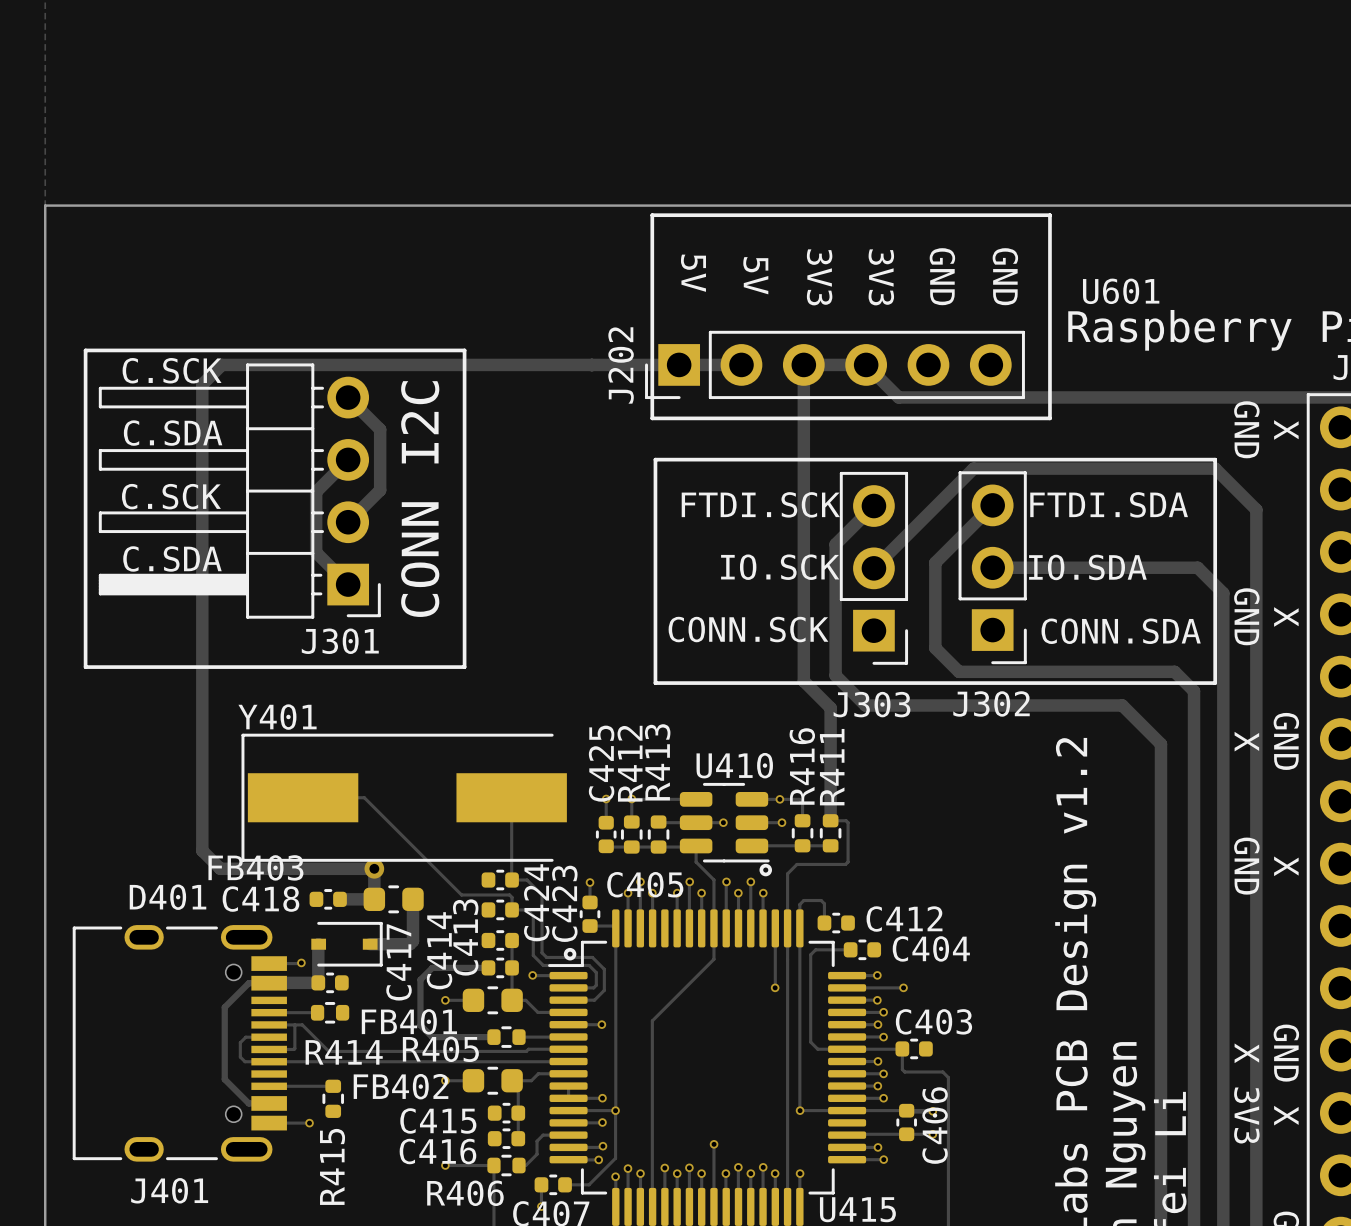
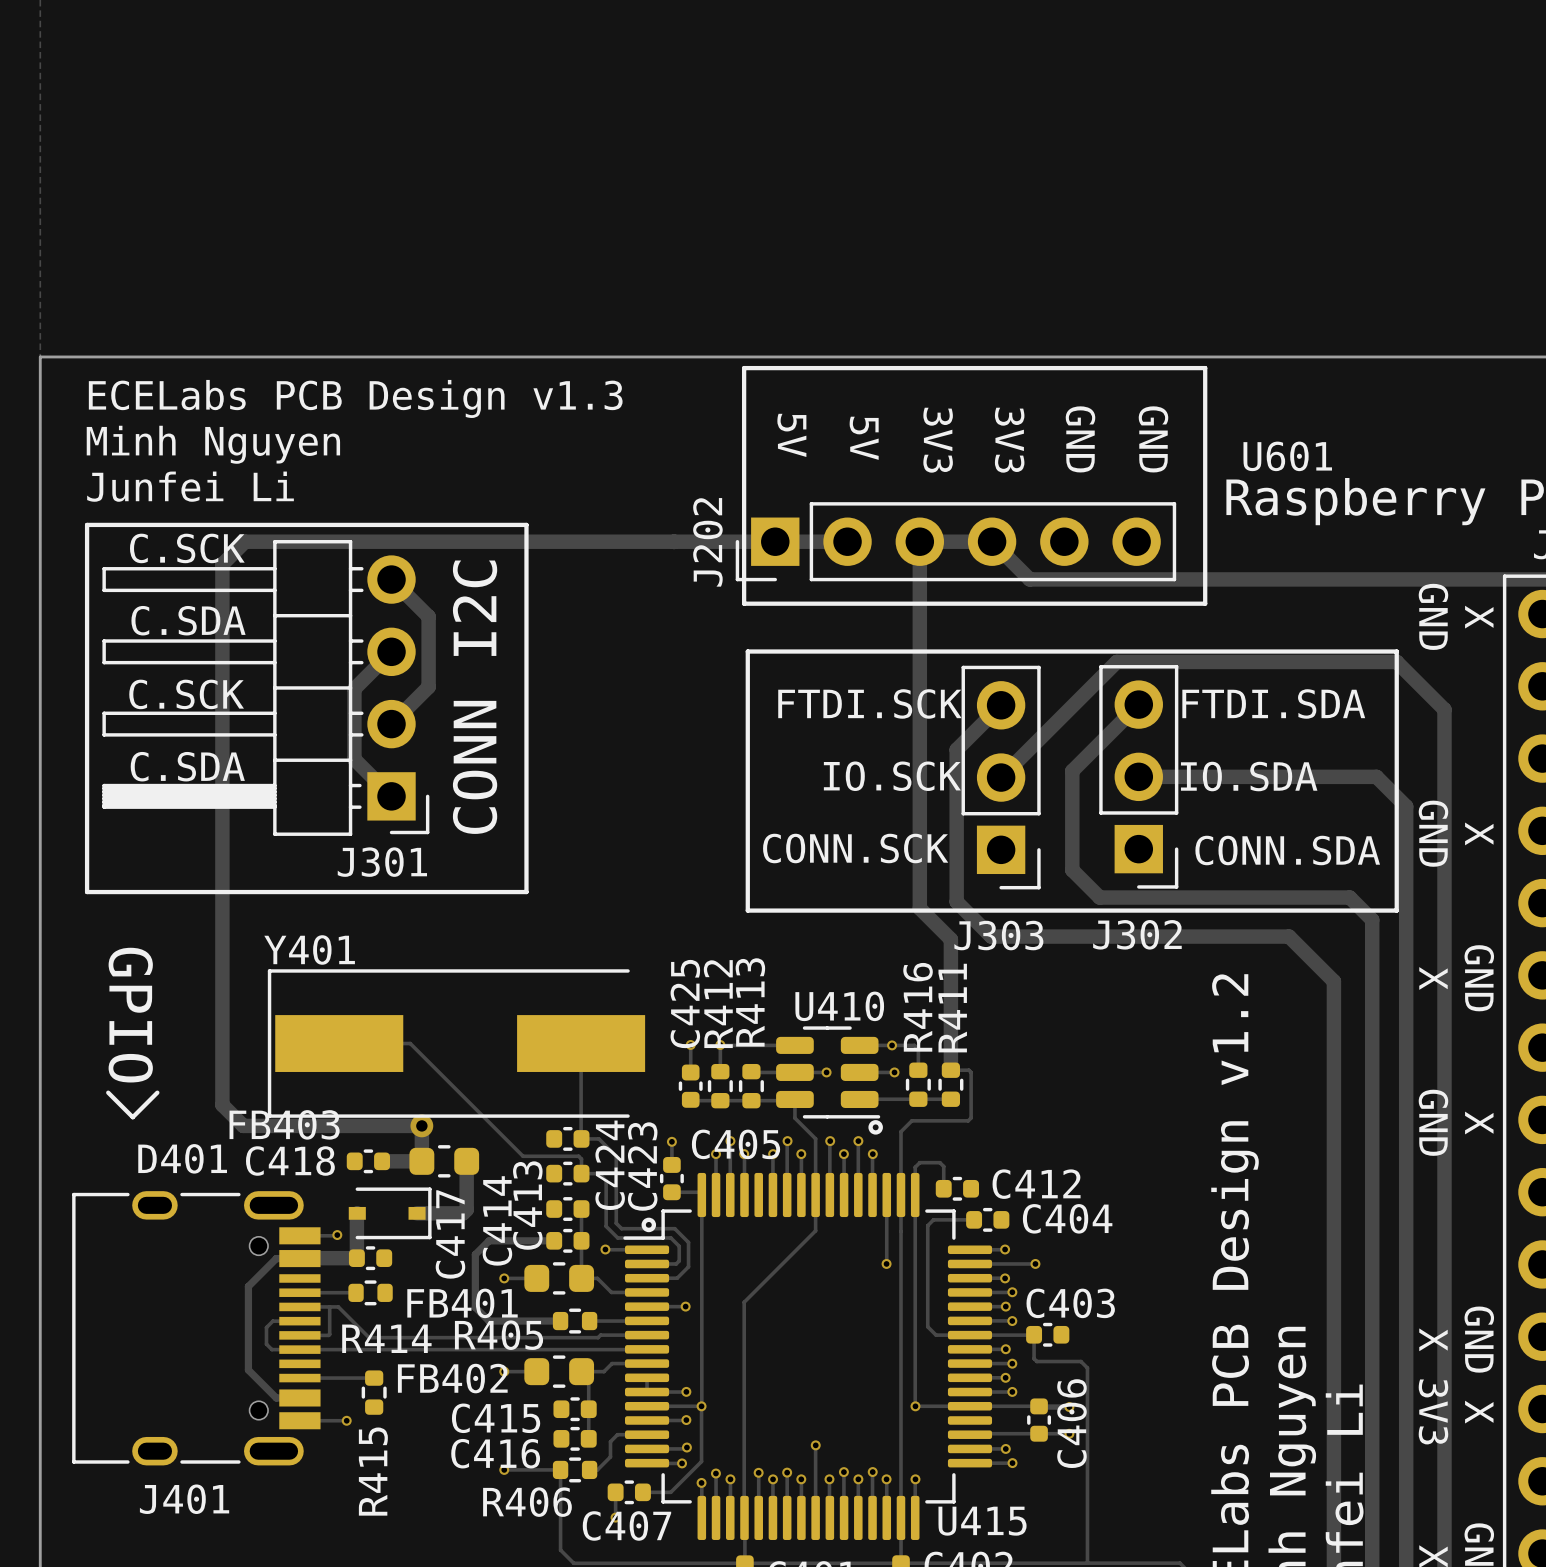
text: none -> ECELabs PCB Design v1.3 (355, 398)
text: none -> Minh Nguyen (213, 444)
text: none -> Junfei Li (190, 486)
text: none -> GPIO (130, 1015)
line: none -> (108, 1092) (132, 1117) (157, 1092)

